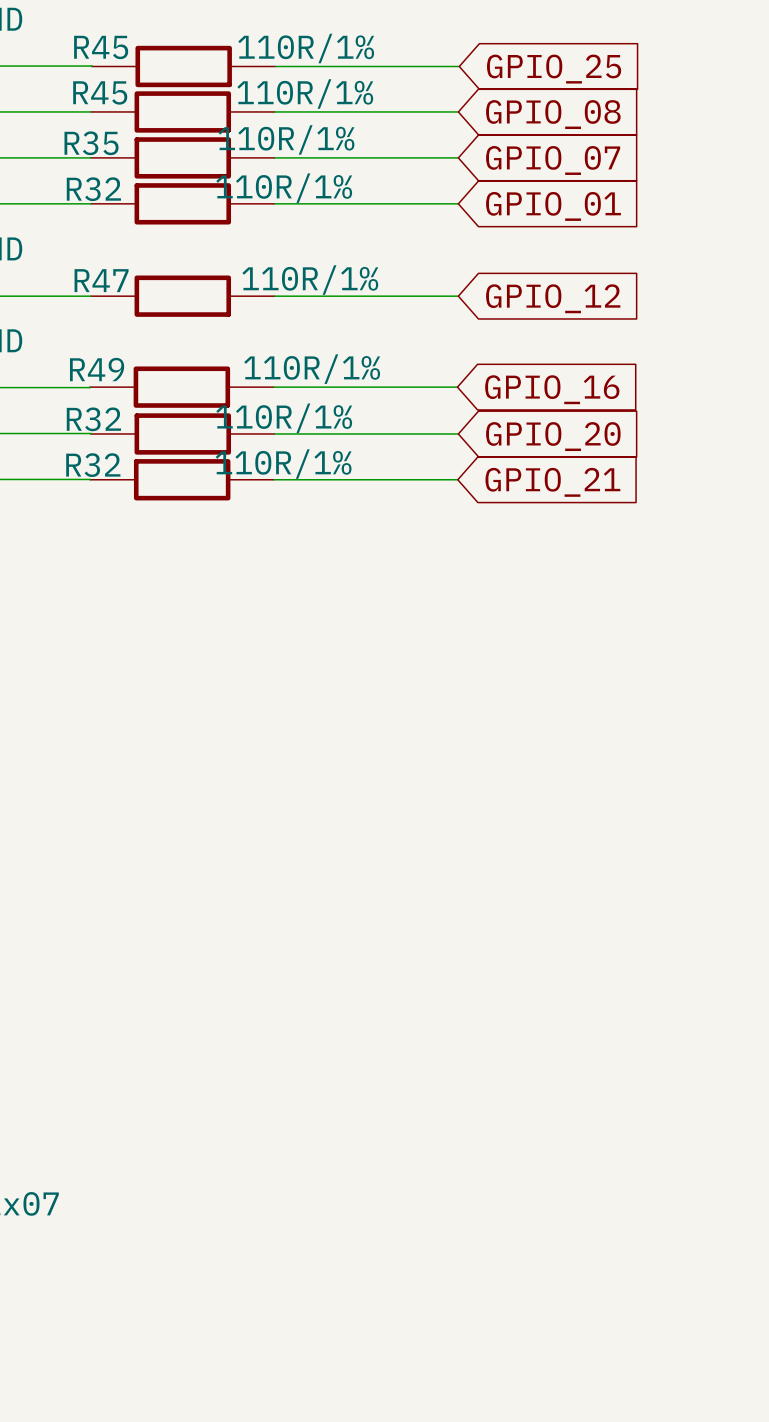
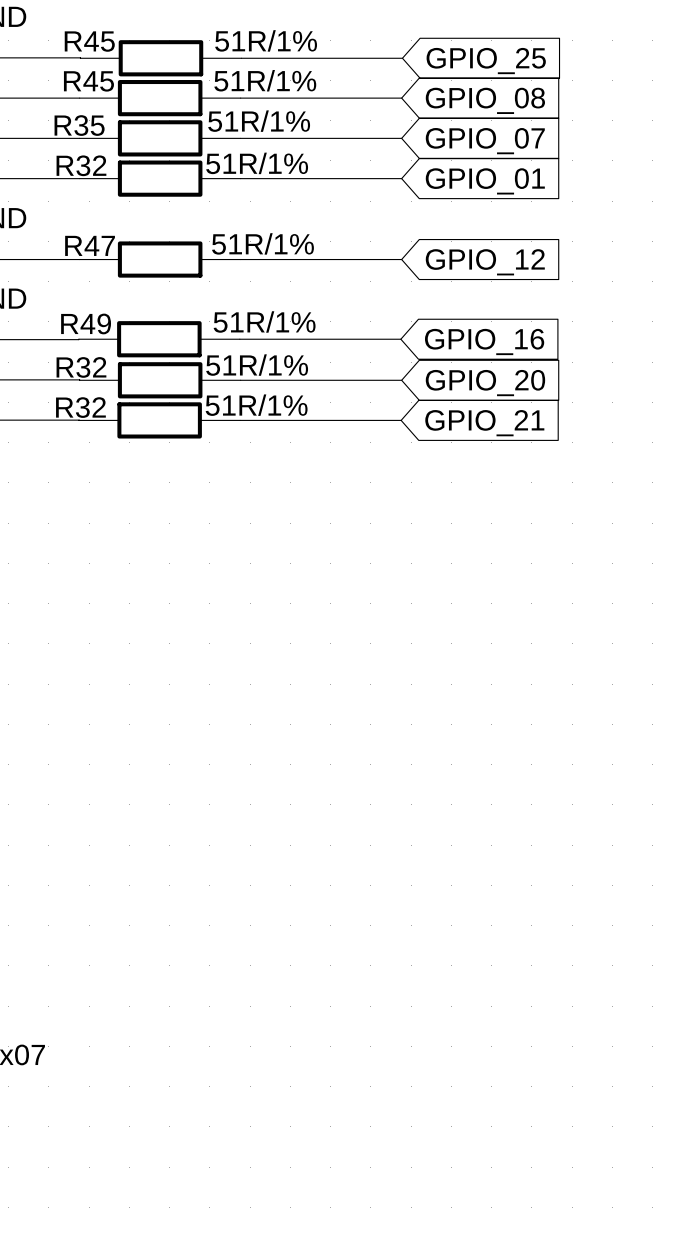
R45 value: 110R/1% (306, 48) -> 51R/1% (266, 40)
R45 value: 110R/1% (305, 93) -> 51R/1% (265, 80)
R35 value: 110R/1% (286, 139) -> 51R/1% (259, 121)
R32 value: 110R/1% (284, 188) -> 51R/1% (257, 163)
R47 value: 110R/1% (310, 280) -> 51R/1% (262, 243)
R49 value: 110R/1% (312, 369) -> 51R/1% (264, 321)
R32 value: 110R/1% (284, 418) -> 51R/1% (257, 365)
R32 value: 110R/1% (283, 464) -> 51R/1% (256, 405)

